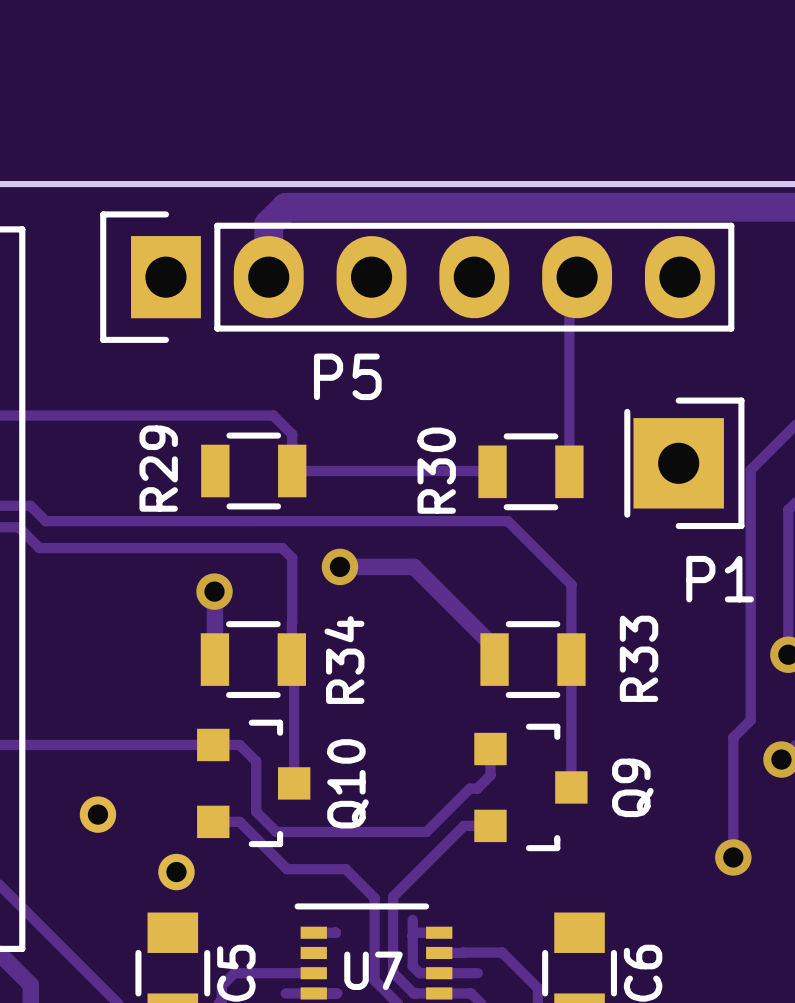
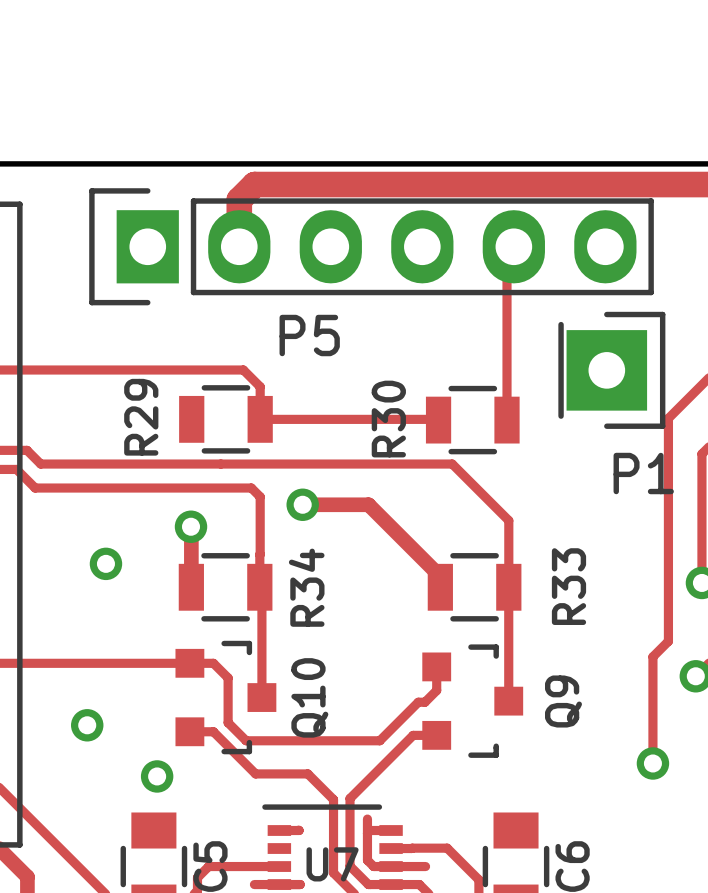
P1 position: (684, 463) -> (611, 370)
part: none -> (105, 563)

